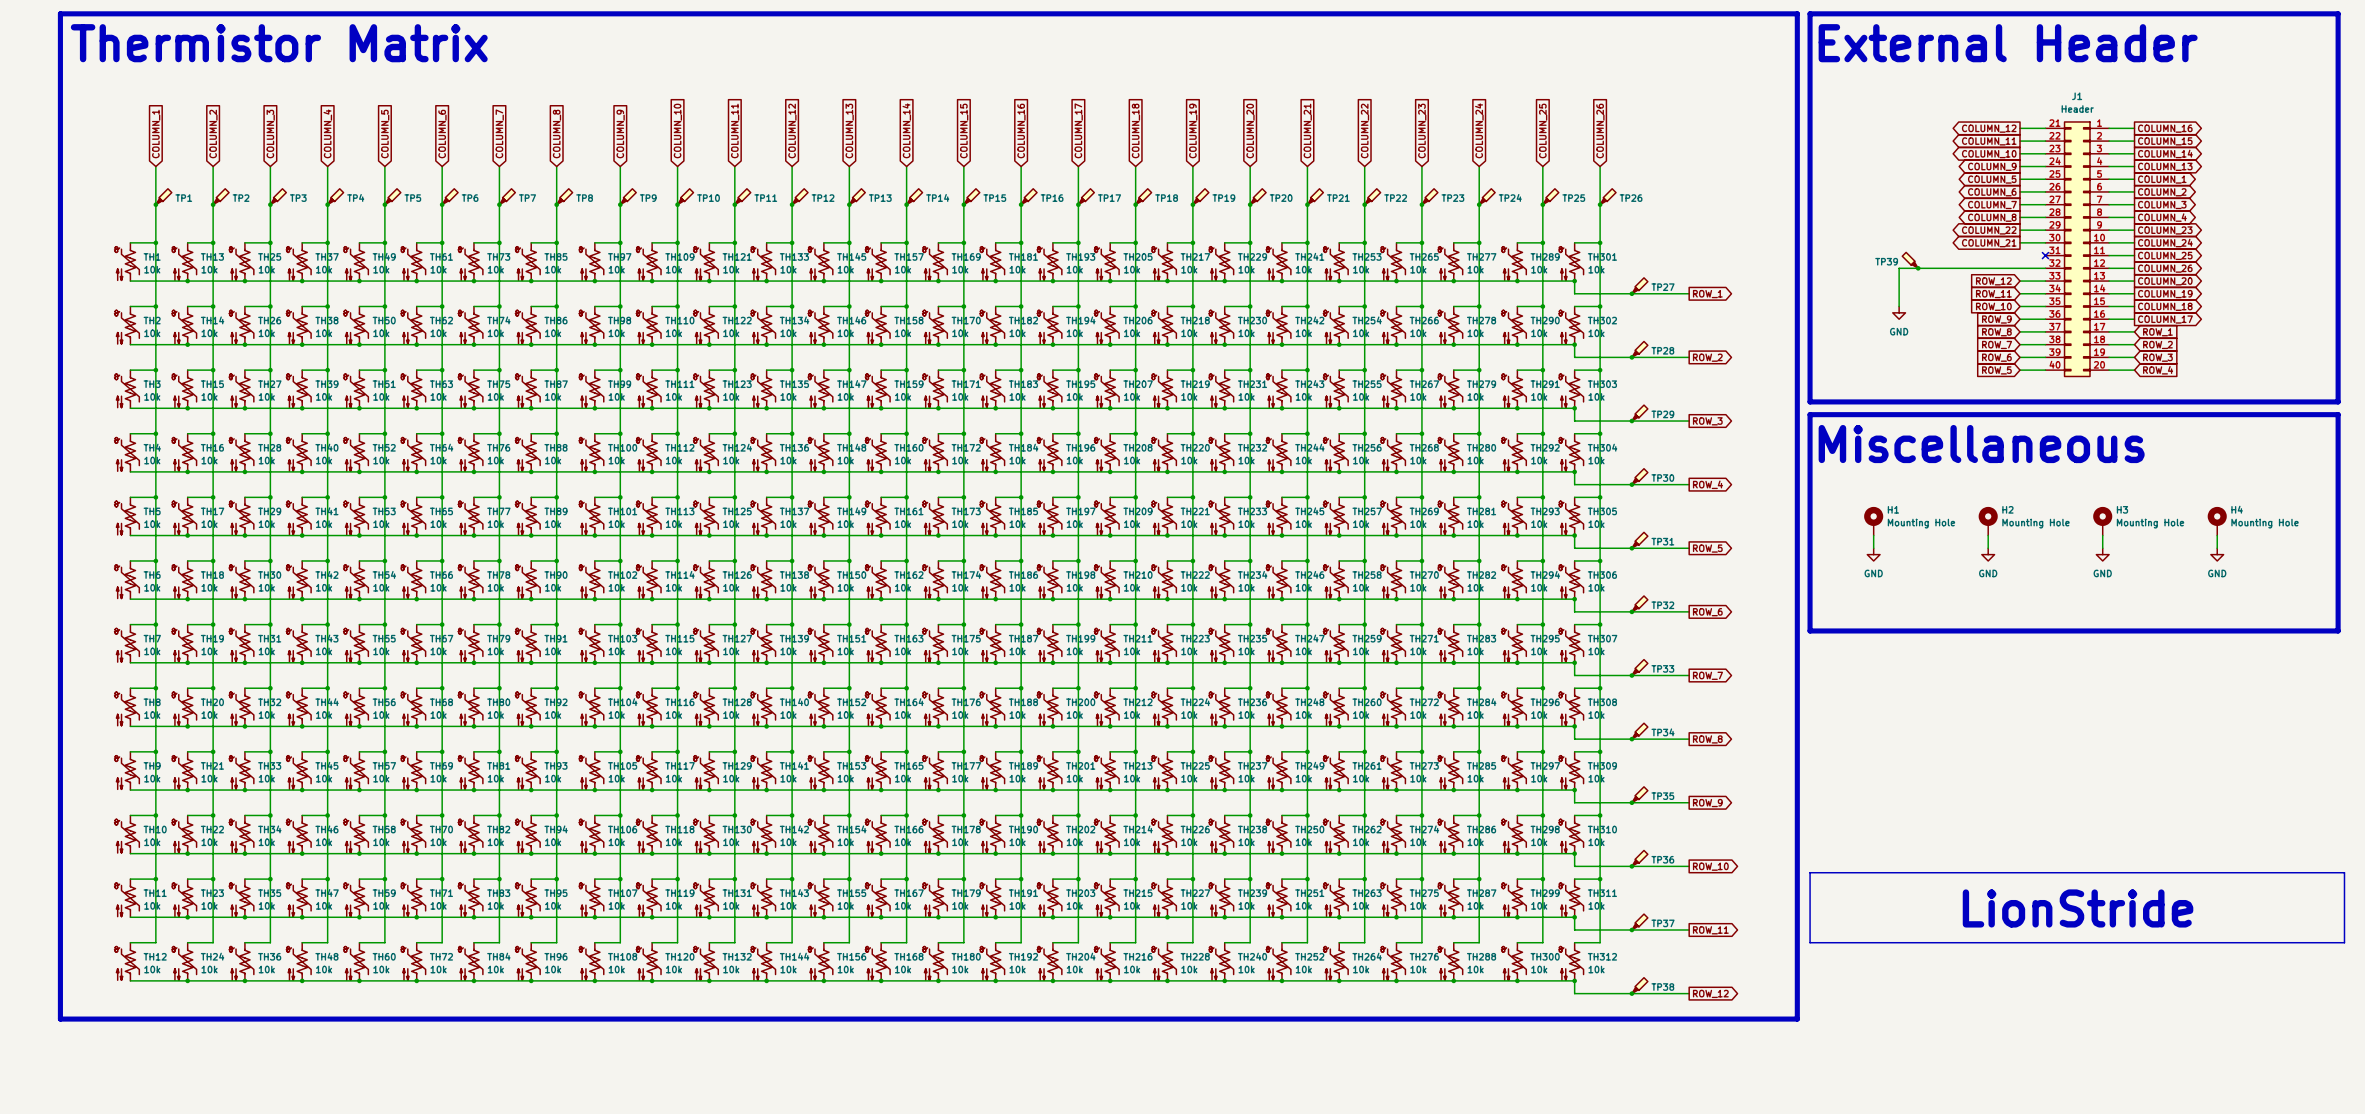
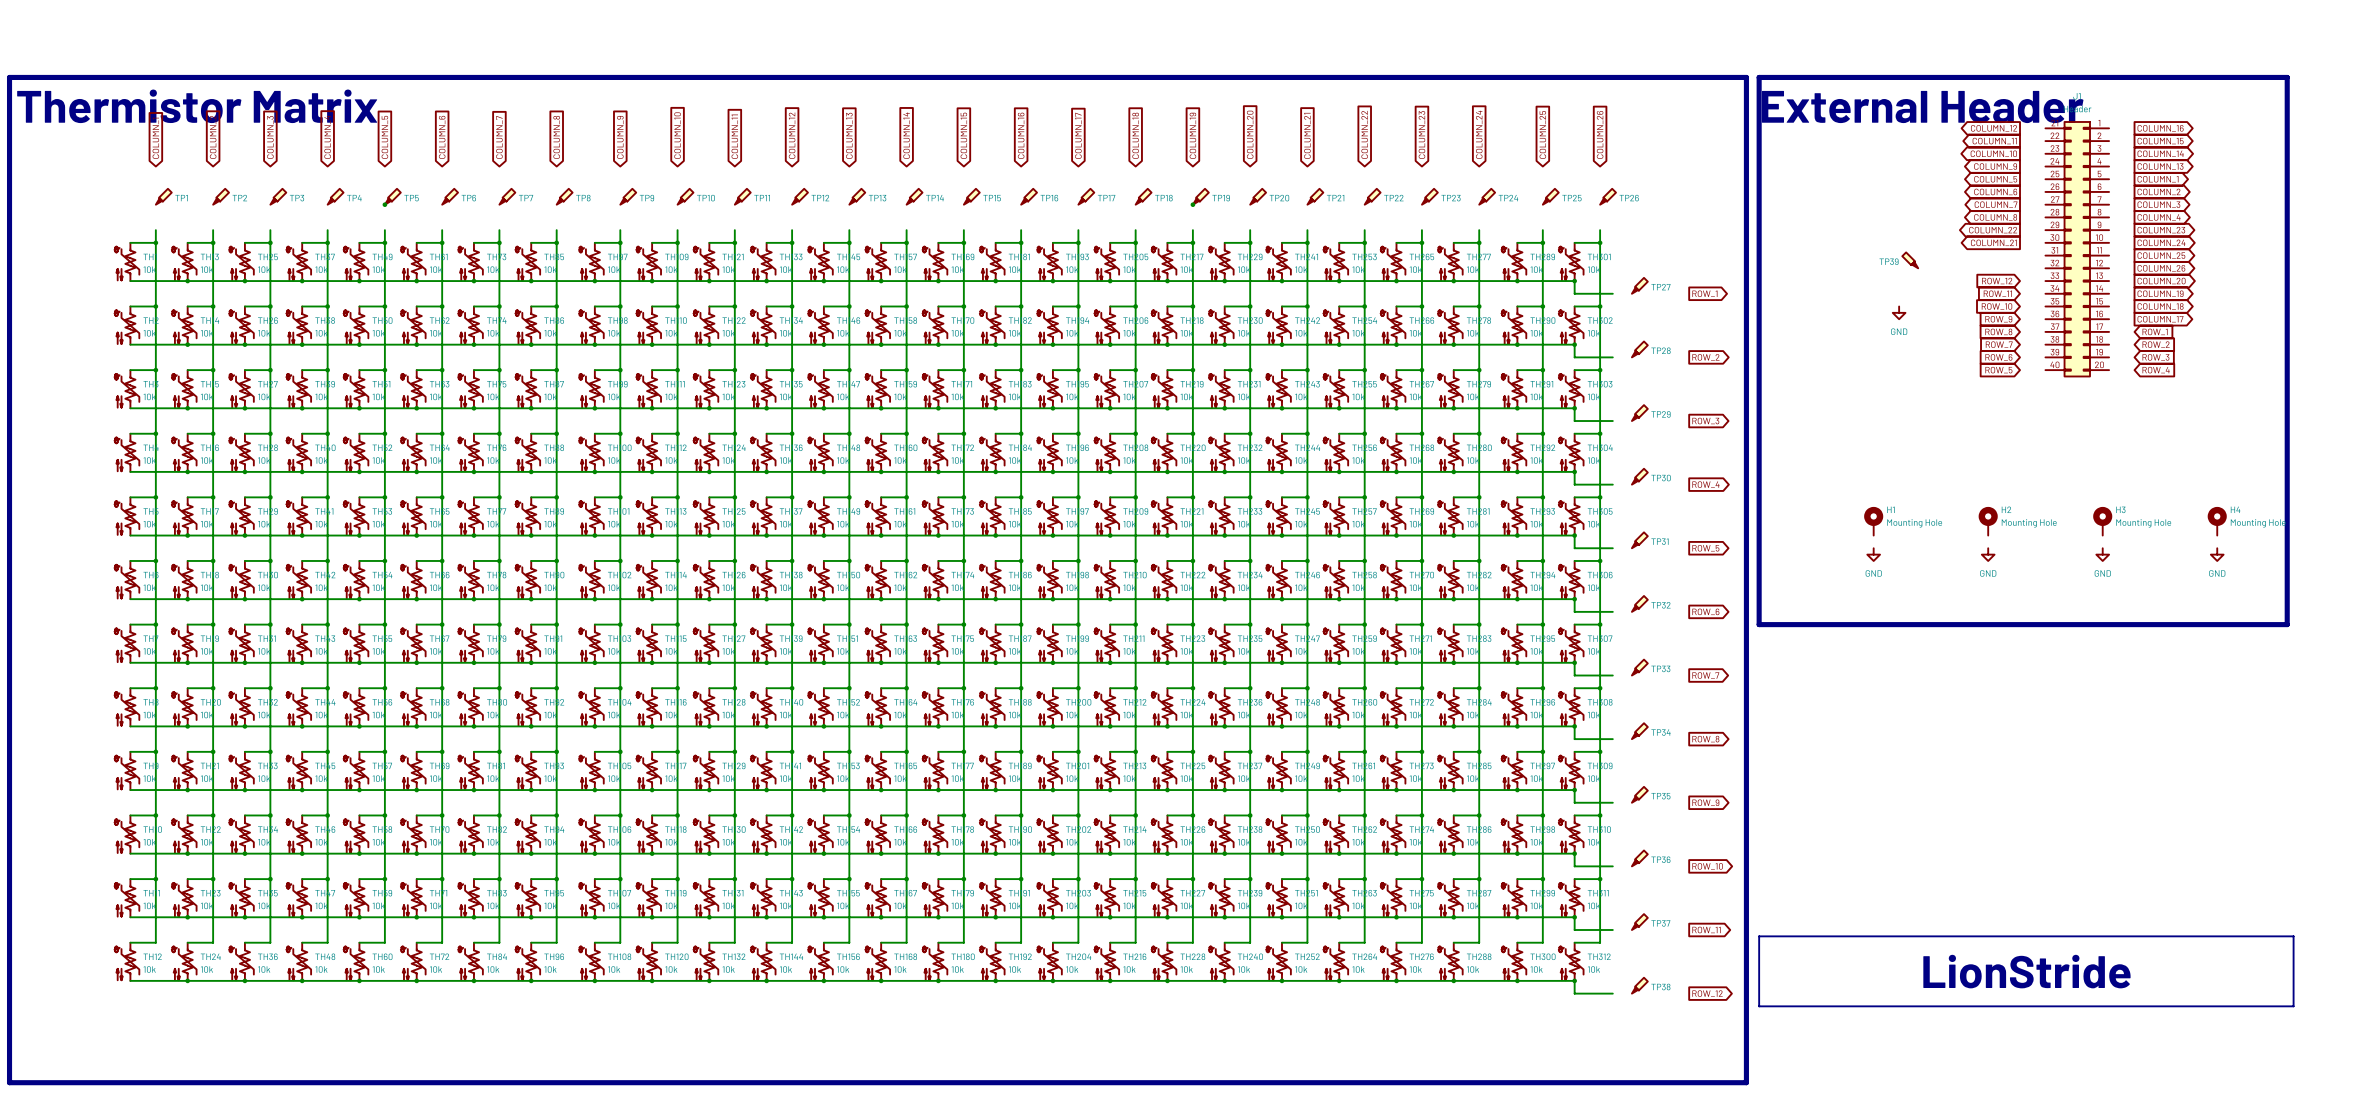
line: (60, 13) (1797, 13) (1797, 1019) (60, 1019) (60, 13) -> (9, 77) (1746, 77) (1746, 1082) (9, 1082) (9, 77)
line: (1810, 13) (1810, 401) (2338, 401) (2338, 13) (1810, 13) -> none
text position: Thermistor Matrix (279, 43) -> Thermistor Matrix (197, 106)
text position: External Header (2008, 43) -> External Header (1922, 107)
line: none -> (1759, 77) (2287, 77) (2287, 624) (1759, 624) (1759, 77)
wire: (2020, 128) (2045, 128) -> none
wire: (2109, 128) (2134, 128) -> none
wire: (2020, 141) (2045, 141) -> none
wire: (2109, 141) (2134, 141) -> none
wire: (2020, 153) (2045, 153) -> none
wire: (2109, 153) (2134, 153) -> none
wire: (155, 166) (155, 230) -> none
wire: (213, 166) (213, 230) -> none
wire: (270, 166) (270, 230) -> none
wire: (327, 166) (327, 230) -> none
wire: (384, 166) (384, 230) -> none
wire: (442, 166) (442, 230) -> none
wire: (499, 166) (499, 230) -> none
wire: (556, 166) (556, 230) -> none
wire: (620, 166) (620, 230) -> none
wire: (677, 166) (677, 230) -> none
wire: (734, 166) (734, 230) -> none
wire: (792, 166) (792, 230) -> none
wire: (849, 166) (849, 230) -> none
wire: (906, 166) (906, 230) -> none
wire: (963, 166) (963, 230) -> none
wire: (1021, 166) (1021, 230) -> none
wire: (1078, 166) (1078, 230) -> none
wire: (1135, 166) (1135, 230) -> none
wire: (1192, 166) (1192, 230) -> none
wire: (1250, 166) (1250, 230) -> none
wire: (1307, 166) (1307, 230) -> none
wire: (1364, 166) (1364, 230) -> none
wire: (1421, 166) (1421, 230) -> none
wire: (1479, 166) (1479, 230) -> none
wire: (1542, 166) (1542, 230) -> none
wire: (1600, 166) (1600, 230) -> none
wire: (2020, 166) (2045, 166) -> none
wire: (2109, 166) (2134, 166) -> none
wire: (2020, 179) (2045, 179) -> none
wire: (2109, 179) (2134, 179) -> none
wire: (2020, 191) (2045, 191) -> none
wire: (2109, 191) (2134, 191) -> none
junction: (155, 204) -> none
junction: (213, 204) -> none
junction: (270, 204) -> none
junction: (327, 204) -> none
junction: (442, 204) -> none
junction: (499, 204) -> none
junction: (556, 204) -> none
junction: (620, 204) -> none
junction: (677, 204) -> none
junction: (734, 204) -> none
junction: (792, 204) -> none
junction: (849, 204) -> none
junction: (906, 204) -> none
junction: (963, 204) -> none
junction: (1021, 204) -> none
junction: (1078, 204) -> none
junction: (1135, 204) -> none
junction: (1250, 204) -> none
junction: (1307, 204) -> none
junction: (1364, 204) -> none
junction: (1421, 204) -> none
junction: (1479, 204) -> none
junction: (1542, 204) -> none
junction: (1600, 204) -> none
wire: (2020, 204) (2045, 204) -> none
wire: (2109, 204) (2134, 204) -> none
wire: (2020, 217) (2045, 217) -> none
wire: (2109, 217) (2134, 217) -> none
wire: (2020, 230) (2045, 230) -> none
wire: (2109, 230) (2134, 230) -> none
wire: (2020, 242) (2045, 242) -> none
wire: (2109, 242) (2134, 242) -> none
no-connect mark: (2045, 255) -> none
wire: (2109, 255) (2134, 255) -> none
junction: (1918, 268) -> none
wire: (2045, 268) (1899, 268) (1899, 306) -> none
wire: (2109, 268) (2134, 268) -> none
wire: (2020, 281) (2045, 281) -> none
wire: (2109, 281) (2134, 281) -> none
wire: (1612, 293) (1689, 293) -> none
junction: (1631, 293) -> none
wire: (2020, 293) (2045, 293) -> none
wire: (2109, 293) (2134, 293) -> none
wire: (2020, 306) (2045, 306) -> none
wire: (2109, 306) (2134, 306) -> none
wire: (2020, 319) (2045, 319) -> none
wire: (2109, 319) (2134, 319) -> none
wire: (2020, 331) (2045, 331) -> none
wire: (2109, 331) (2134, 331) -> none
wire: (2020, 344) (2045, 344) -> none
wire: (2109, 344) (2134, 344) -> none
wire: (1612, 357) (1689, 357) -> none
junction: (1631, 357) -> none
wire: (2020, 357) (2045, 357) -> none
wire: (2109, 357) (2134, 357) -> none
wire: (2020, 370) (2045, 370) -> none
wire: (2109, 370) (2134, 370) -> none
line: (1810, 414) (2338, 414) (2338, 630) (1810, 630) (1810, 414) -> none
wire: (1612, 421) (1689, 421) -> none
junction: (1631, 421) -> none
text: Miscellaneous (1981, 444) -> none
wire: (1612, 484) (1689, 484) -> none
junction: (1631, 484) -> none
wire: (1873, 535) (1873, 548) -> none
wire: (1988, 535) (1988, 548) -> none
wire: (2102, 535) (2102, 548) -> none
wire: (2217, 535) (2217, 548) -> none
wire: (1612, 548) (1689, 548) -> none
junction: (1631, 548) -> none
wire: (1612, 611) (1689, 611) -> none
junction: (1631, 611) -> none
wire: (1612, 675) (1689, 675) -> none
junction: (1631, 675) -> none
wire: (1612, 739) (1689, 739) -> none
junction: (1631, 739) -> none
wire: (1612, 802) (1689, 802) -> none
junction: (1631, 802) -> none
wire: (1612, 866) (1689, 866) -> none
junction: (1631, 866) -> none
line: (1810, 872) (2344, 872) (2344, 942) (1810, 942) (1810, 872) -> (1759, 936) (2293, 936) (2293, 1006) (1759, 1006) (1759, 936)
text position: LionStride (2078, 908) -> LionStride (2027, 971)
wire: (1612, 929) (1689, 929) -> none
junction: (1631, 929) -> none
wire: (1612, 993) (1689, 993) -> none
junction: (1631, 993) -> none

